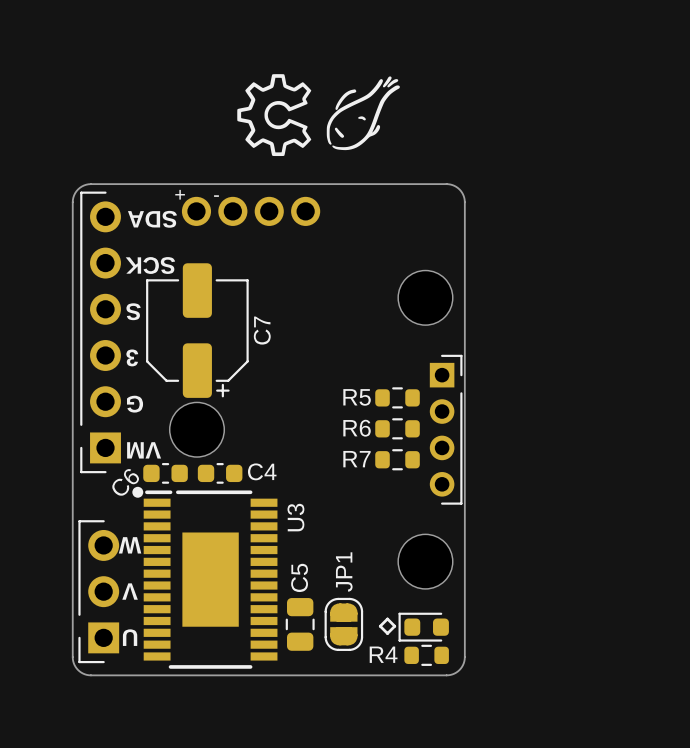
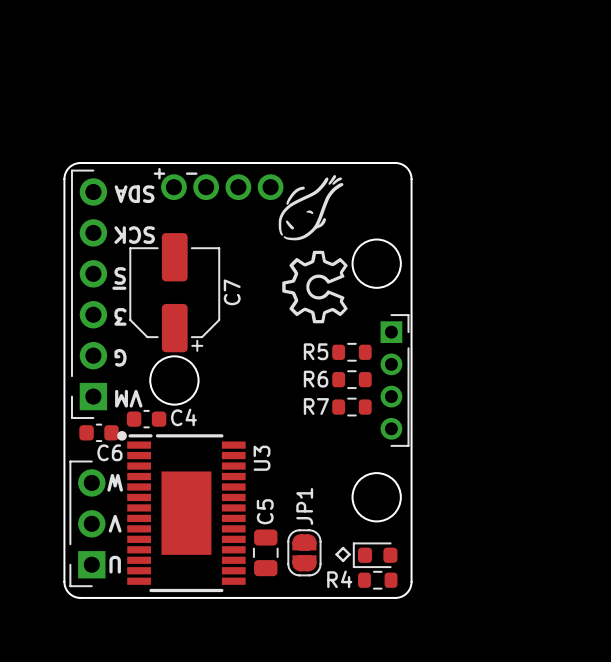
drawing position: (363, 113) -> (311, 207)
drawing position: (274, 115) -> (314, 287)
line: none -> (113, 288) (124, 288)
C4: (220, 473) -> none
C6 name: C6 (125, 482) -> C4 (183, 417)
C6: none -> (99, 432)

